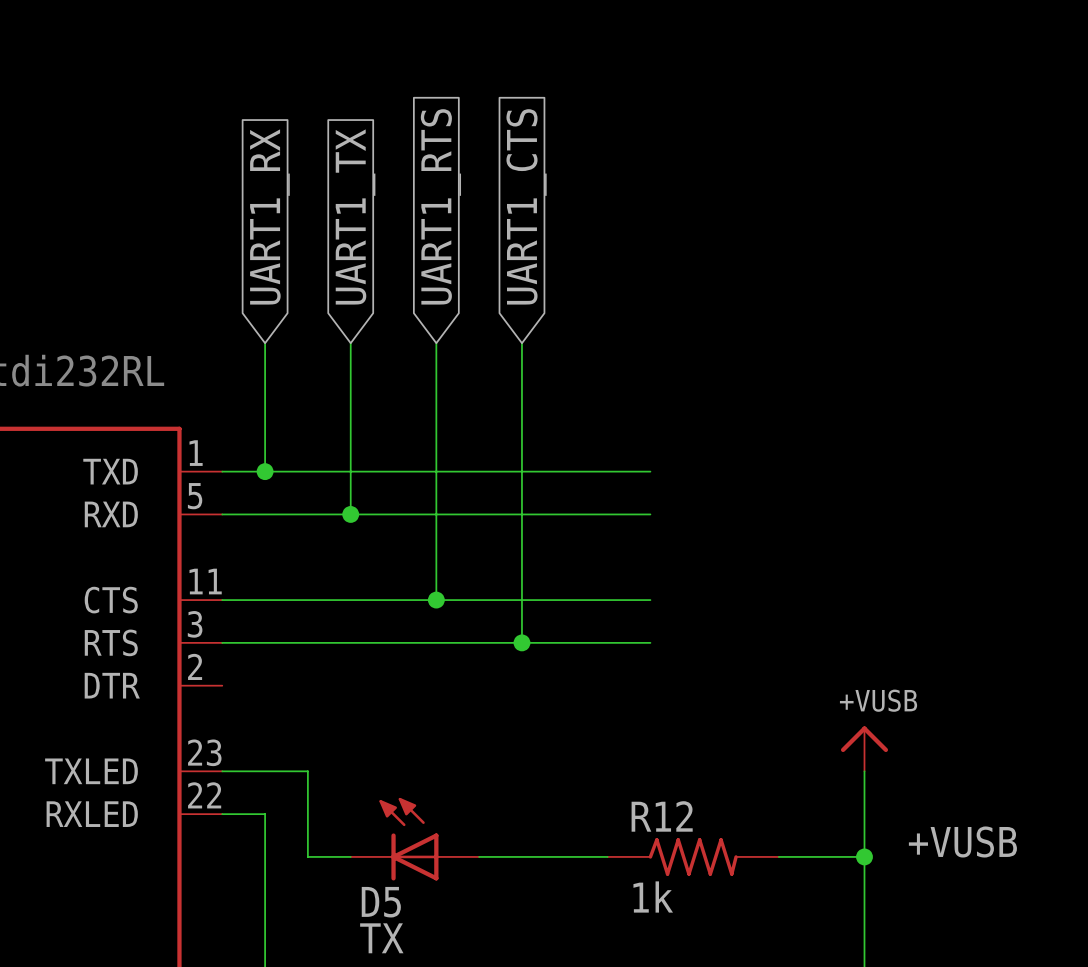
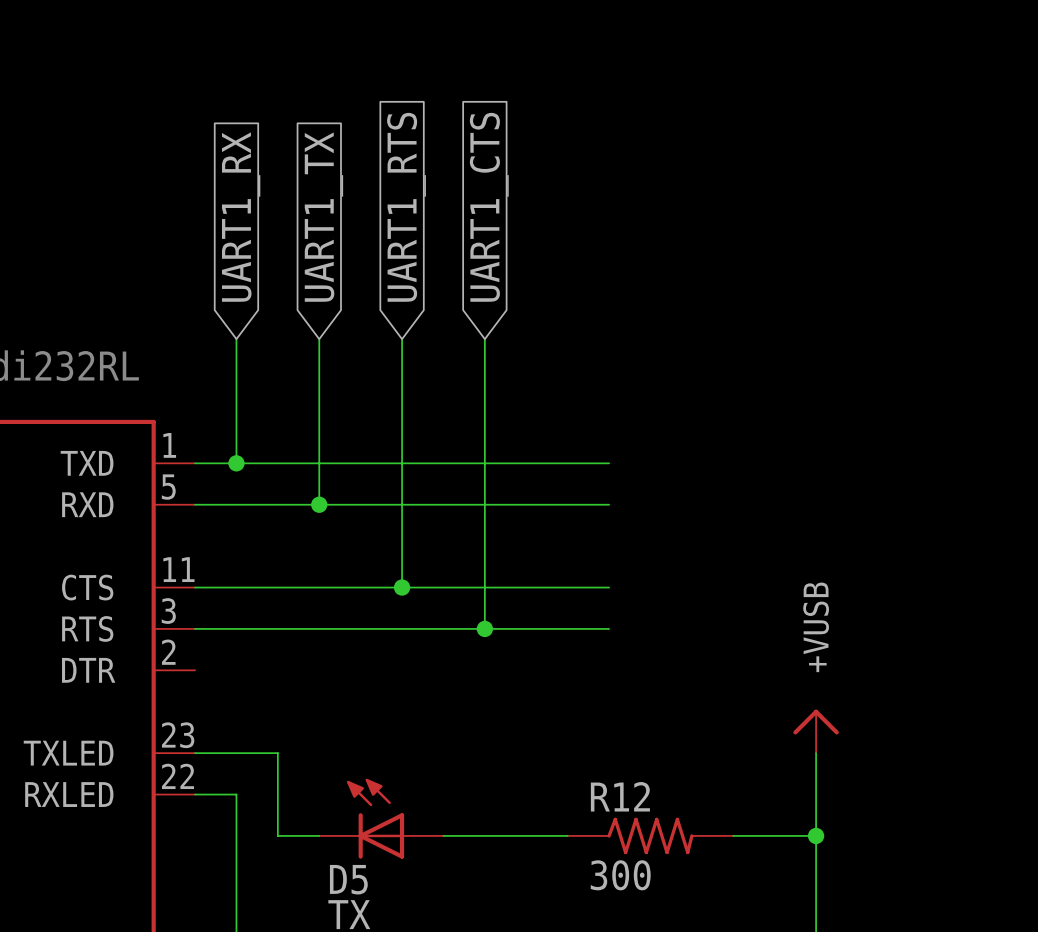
power symbol pin name: none -> +VUSB (816, 627)
power symbol text: +VUSB (878, 700) -> none
label: +VUSB (962, 841) -> none
R12 value: 1k (653, 896) -> 300 (620, 875)

